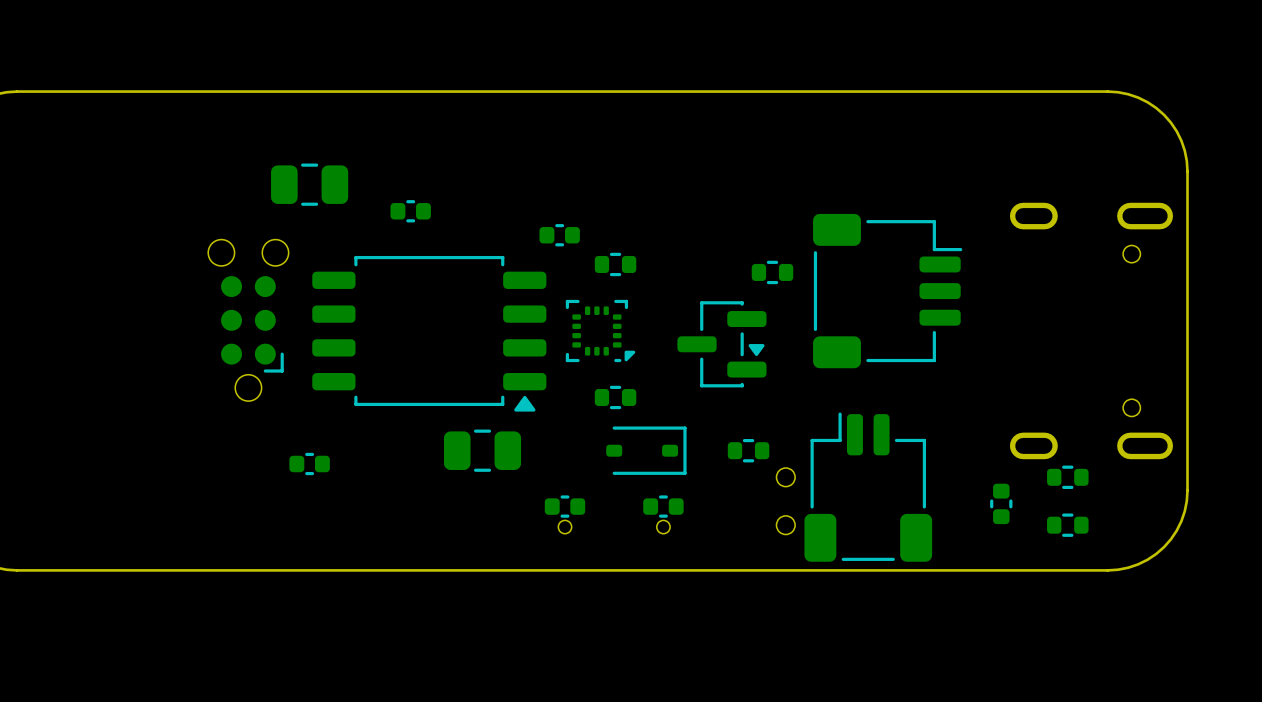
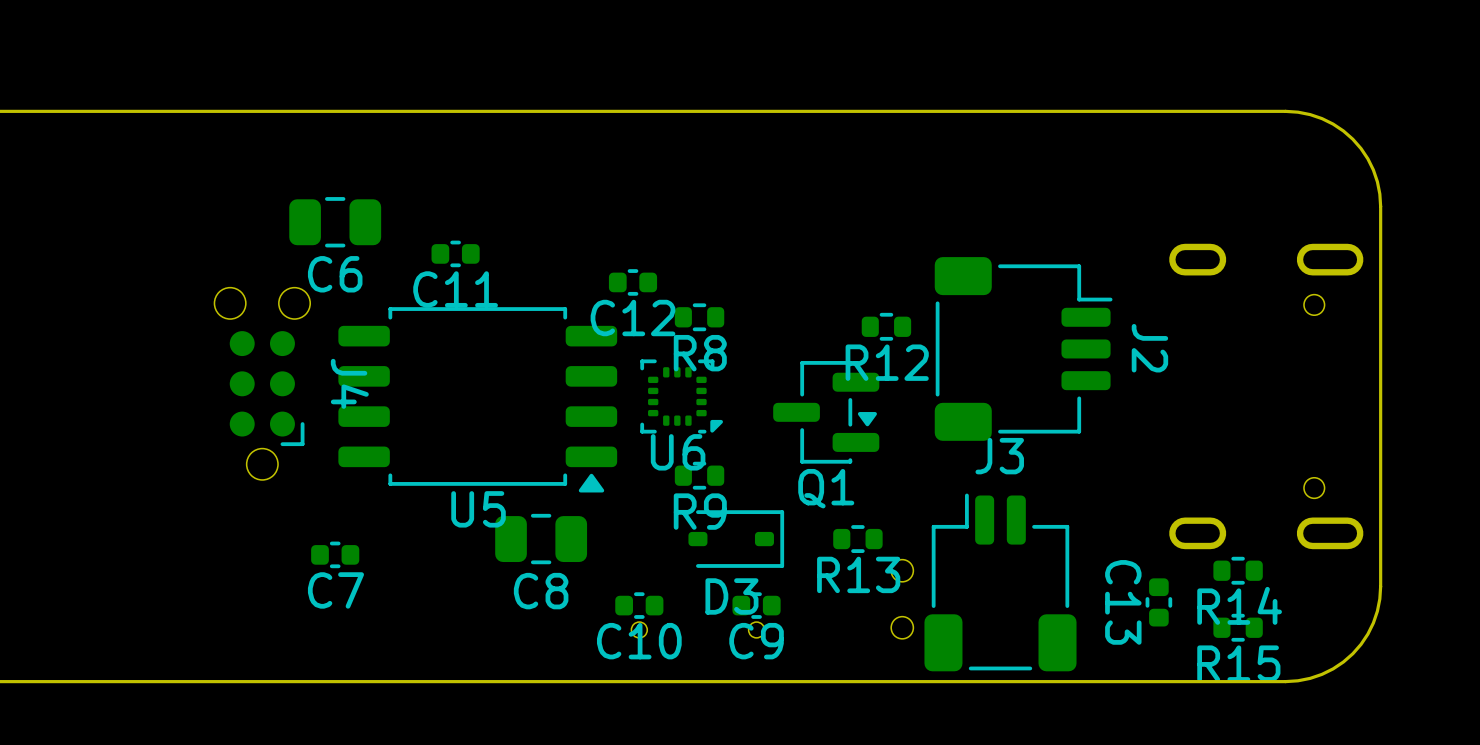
C6 name: none -> C6 (335, 274)
C11 name: none -> C11 (455, 289)
C12 name: none -> C12 (633, 318)
J2 name: none -> J2 (1149, 348)
R8 name: none -> R8 (700, 353)
R12 name: none -> R12 (887, 362)
J4 name: none -> J4 (349, 383)
U6 name: none -> U6 (678, 452)
J3 name: none -> J3 (999, 456)
Q1 name: none -> Q1 (826, 488)
U5 name: none -> U5 (478, 509)
R9 name: none -> R9 (700, 511)
R13 name: none -> R13 (858, 574)
C7 name: none -> C7 (335, 590)
C8 name: none -> C8 (541, 591)
D3 name: none -> D3 (731, 596)
C13 name: none -> C13 (1123, 602)
R14 name: none -> R14 (1239, 605)
C10 name: none -> C10 (639, 641)
C9 name: none -> C9 (756, 641)
R15 name: none -> R15 (1238, 663)

